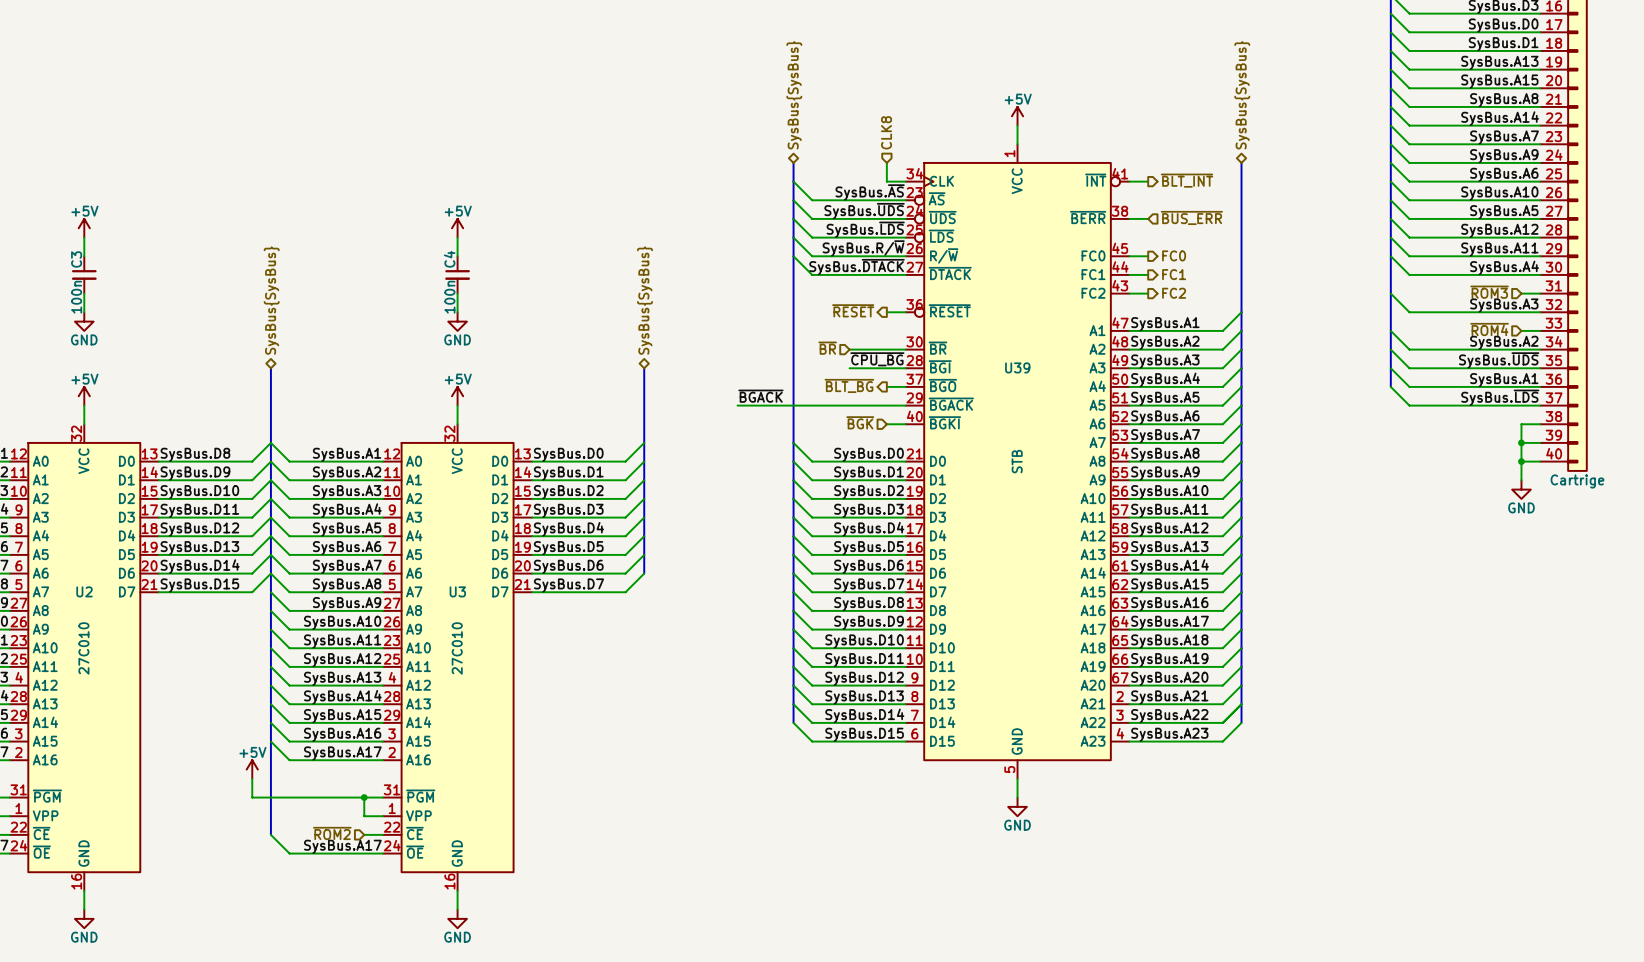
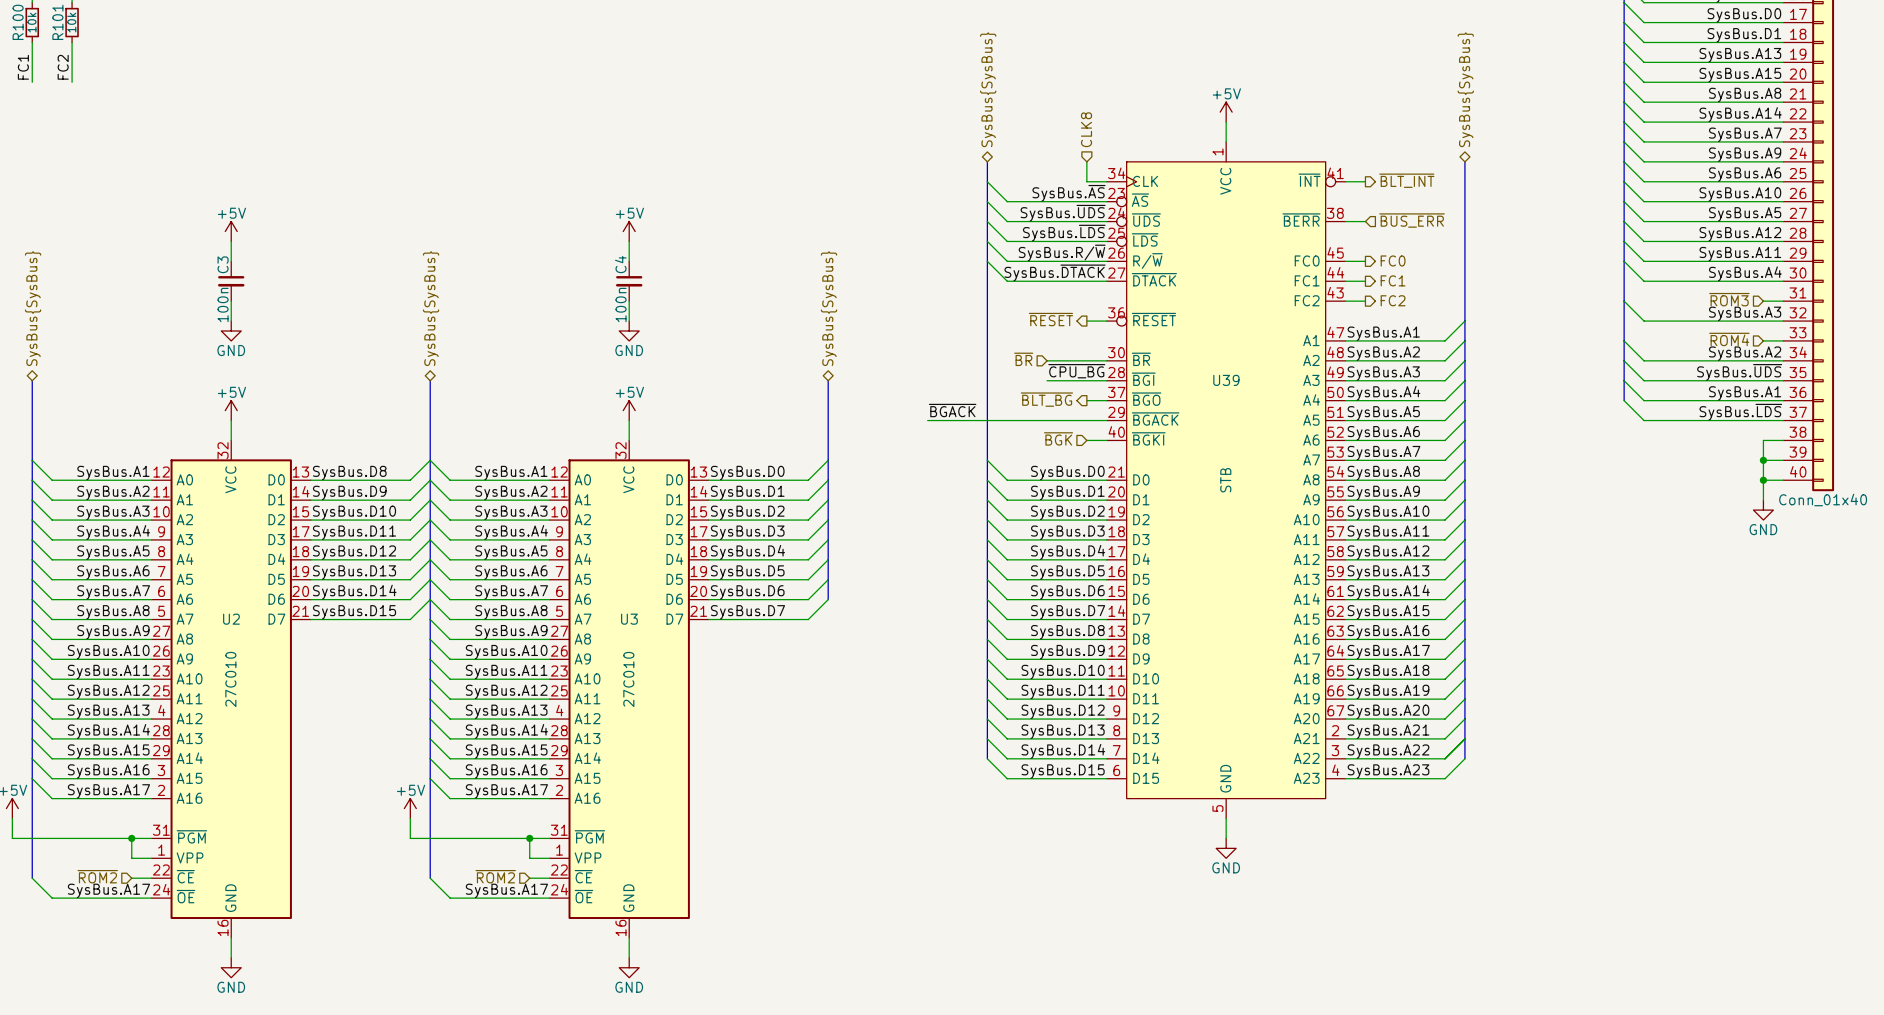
part value: Cartrige (1577, 481) -> Conn_01x40 (1823, 500)

